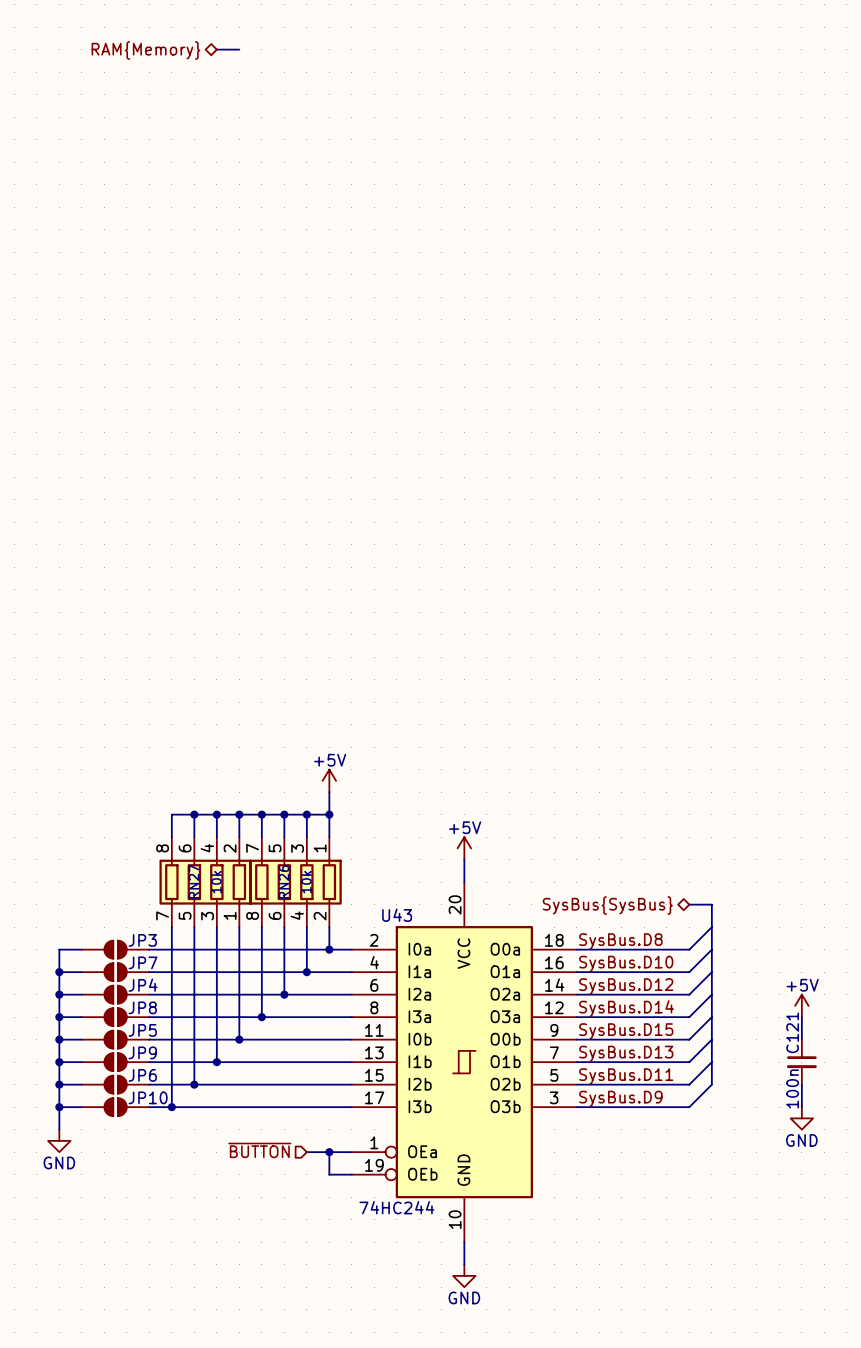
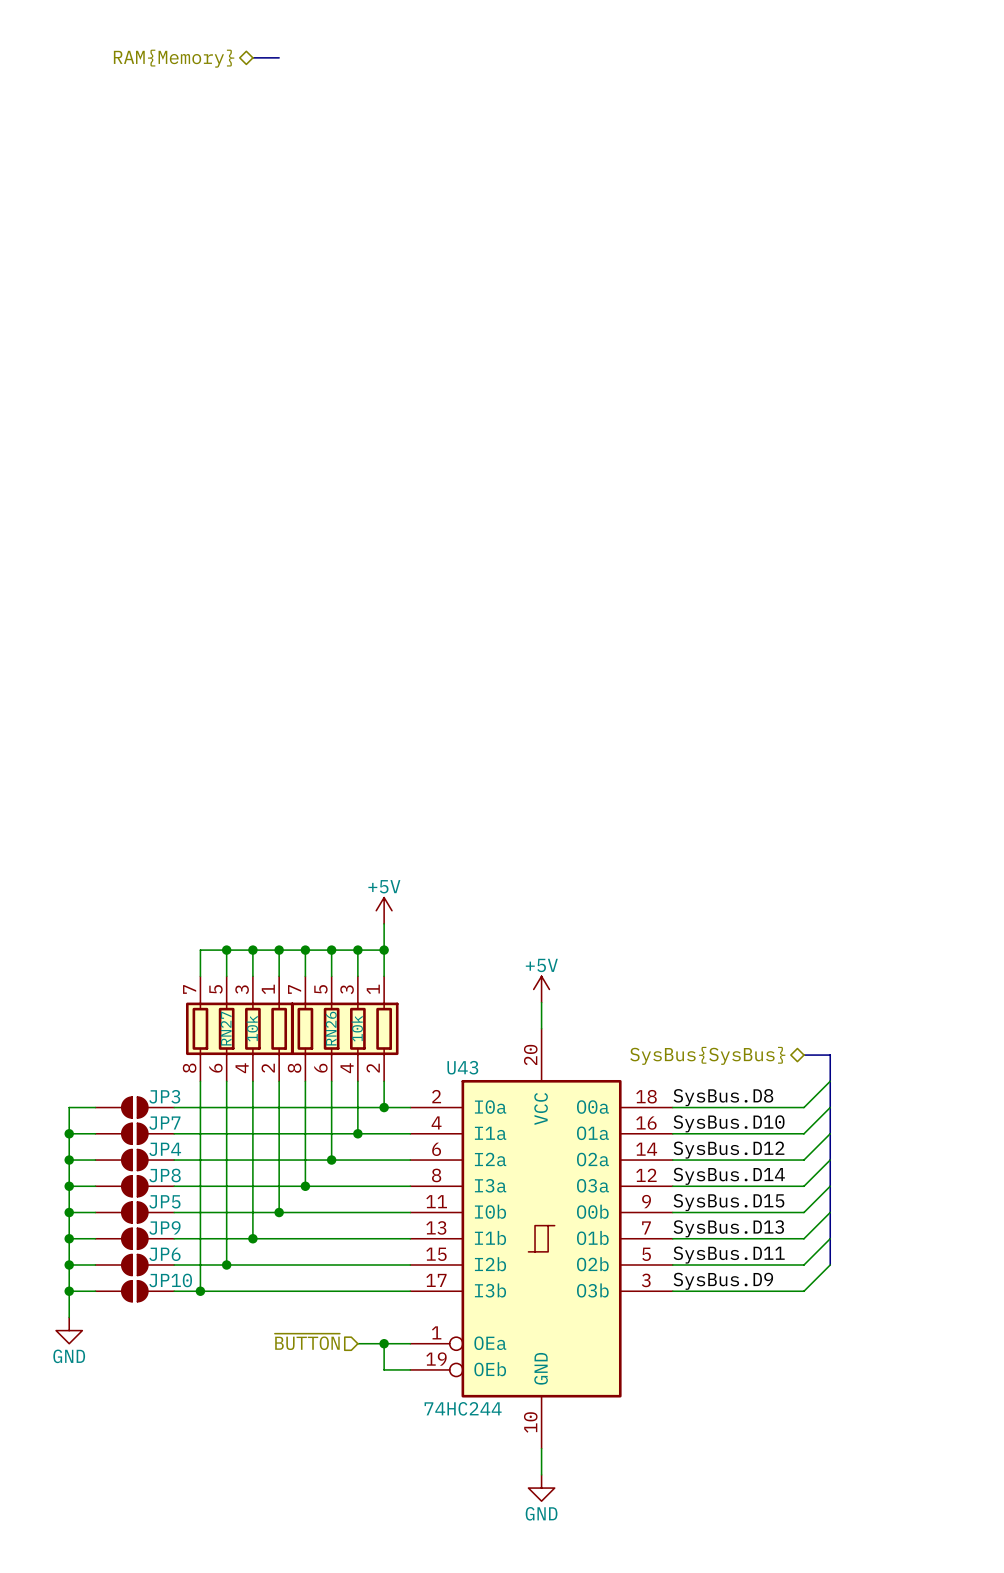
RN27 flip: as is (205, 882) -> up-down (239, 1028)
power symbol: +5V (801, 1005) -> none
wire: (801, 1017) (801, 1039) -> none
C121: 100n (801, 1062) -> none
wire: (801, 1084) (801, 1107) -> none
power symbol: GND (801, 1118) -> none

